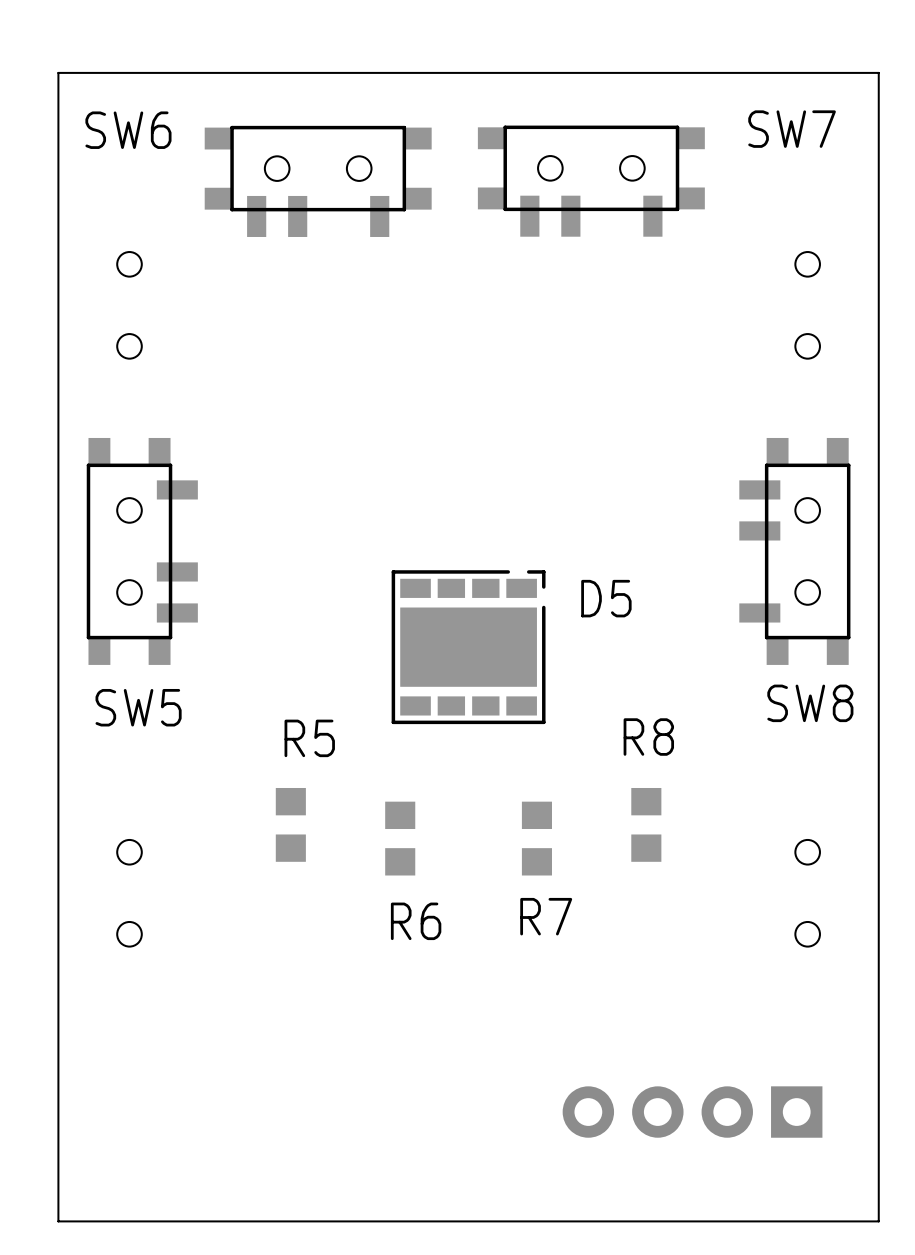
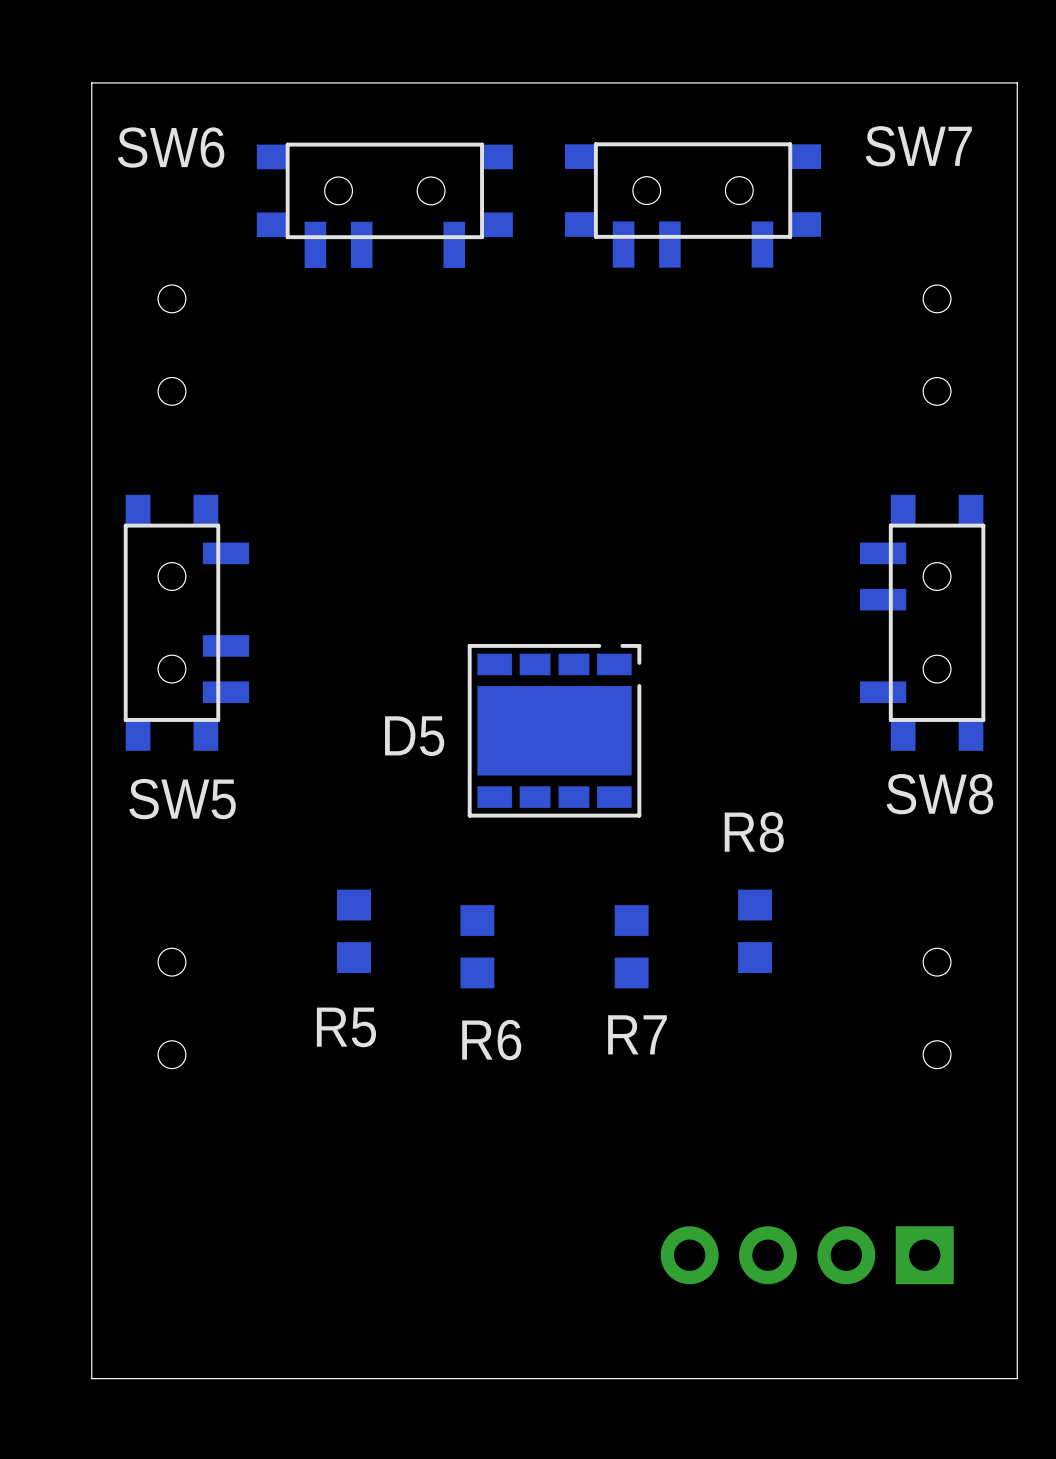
D5 name position: D5 (606, 598) -> D5 (414, 736)
R5 name position: R5 (309, 738) -> R5 (346, 1027)

